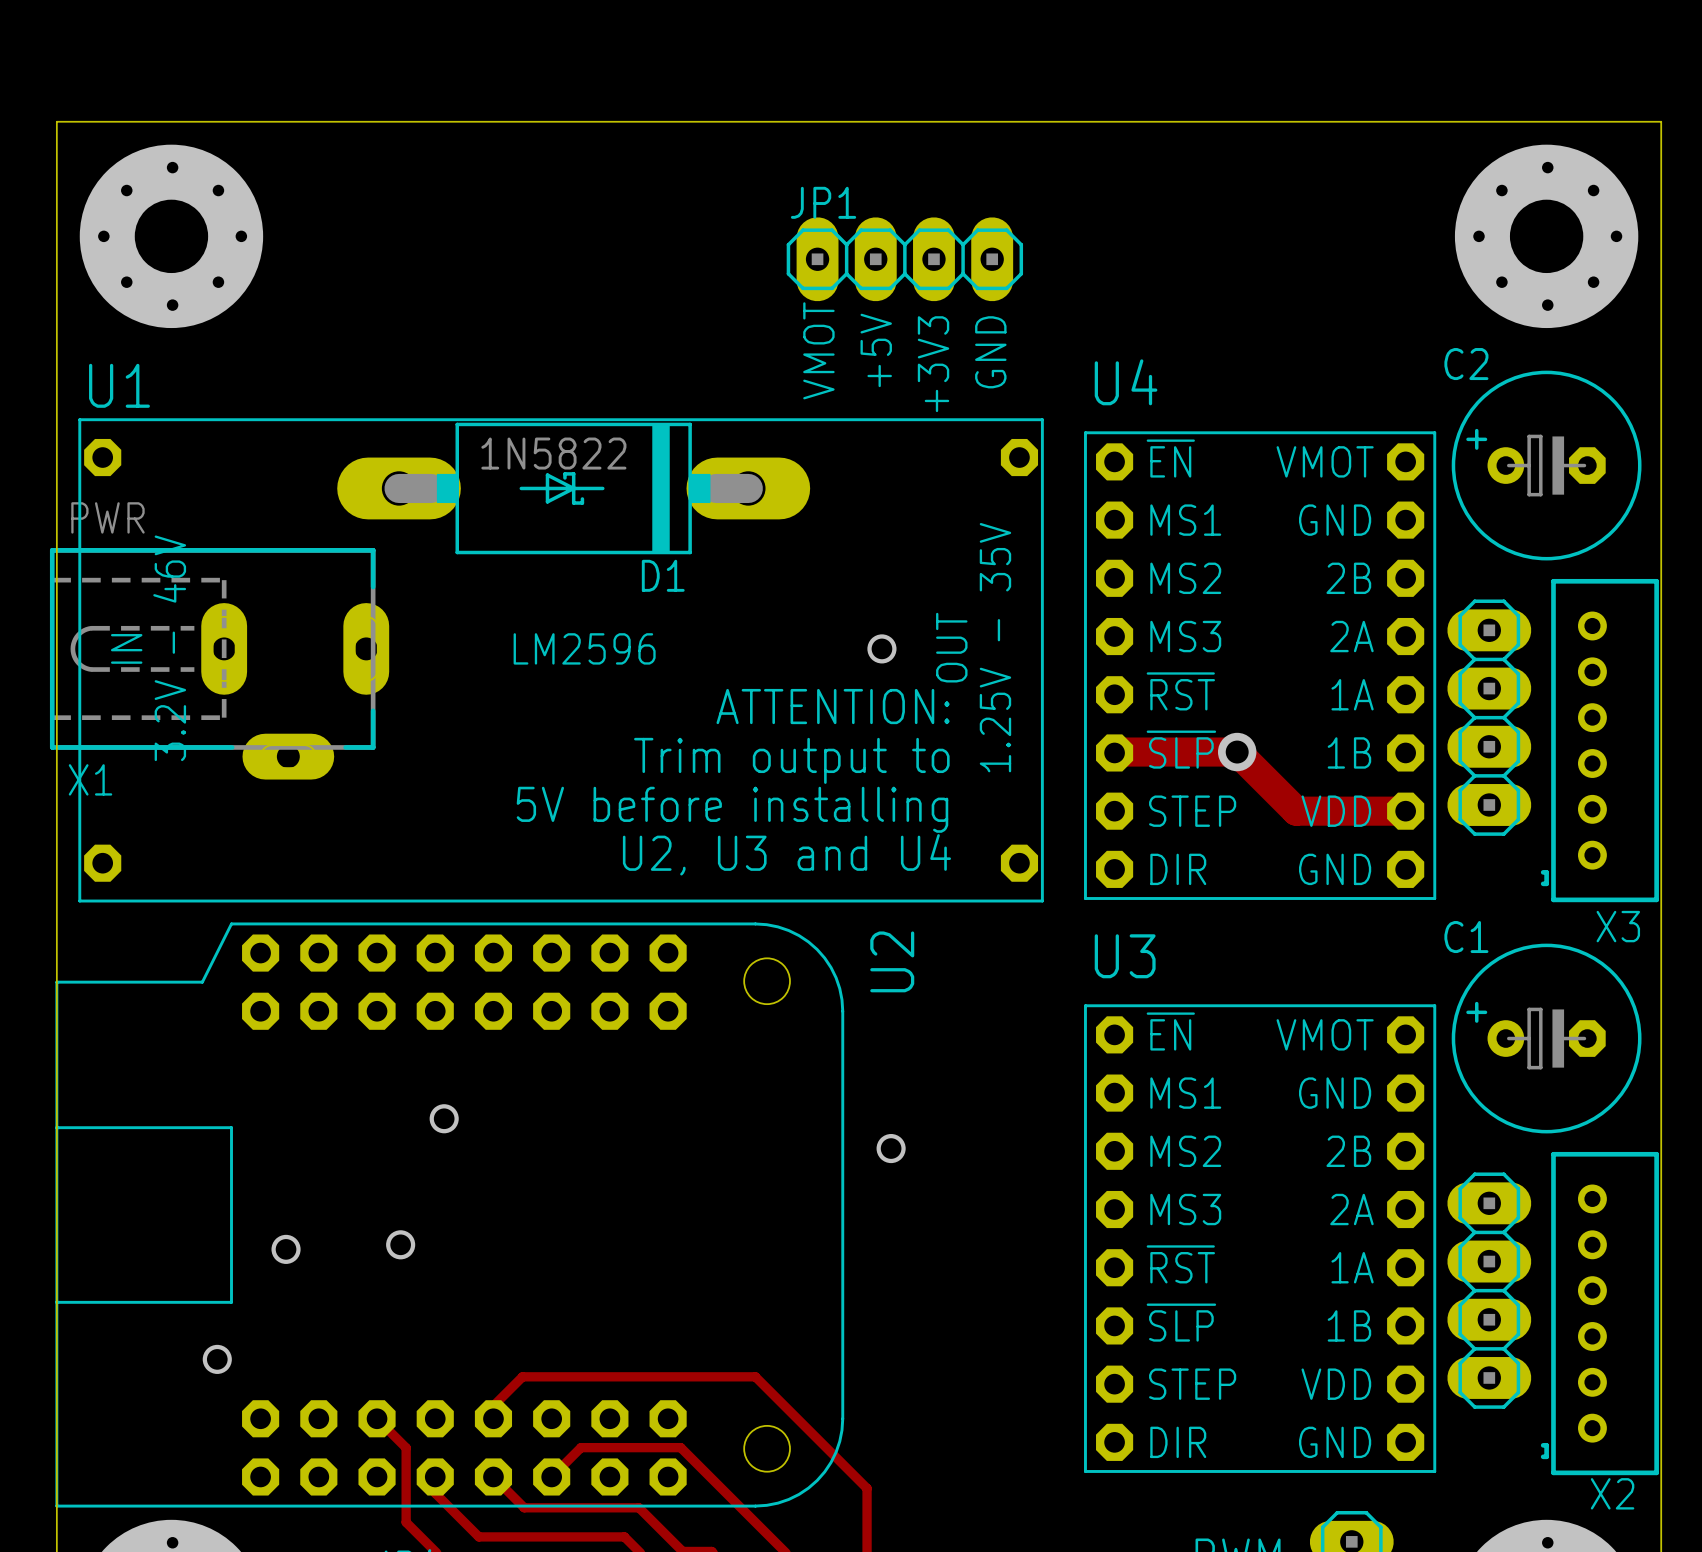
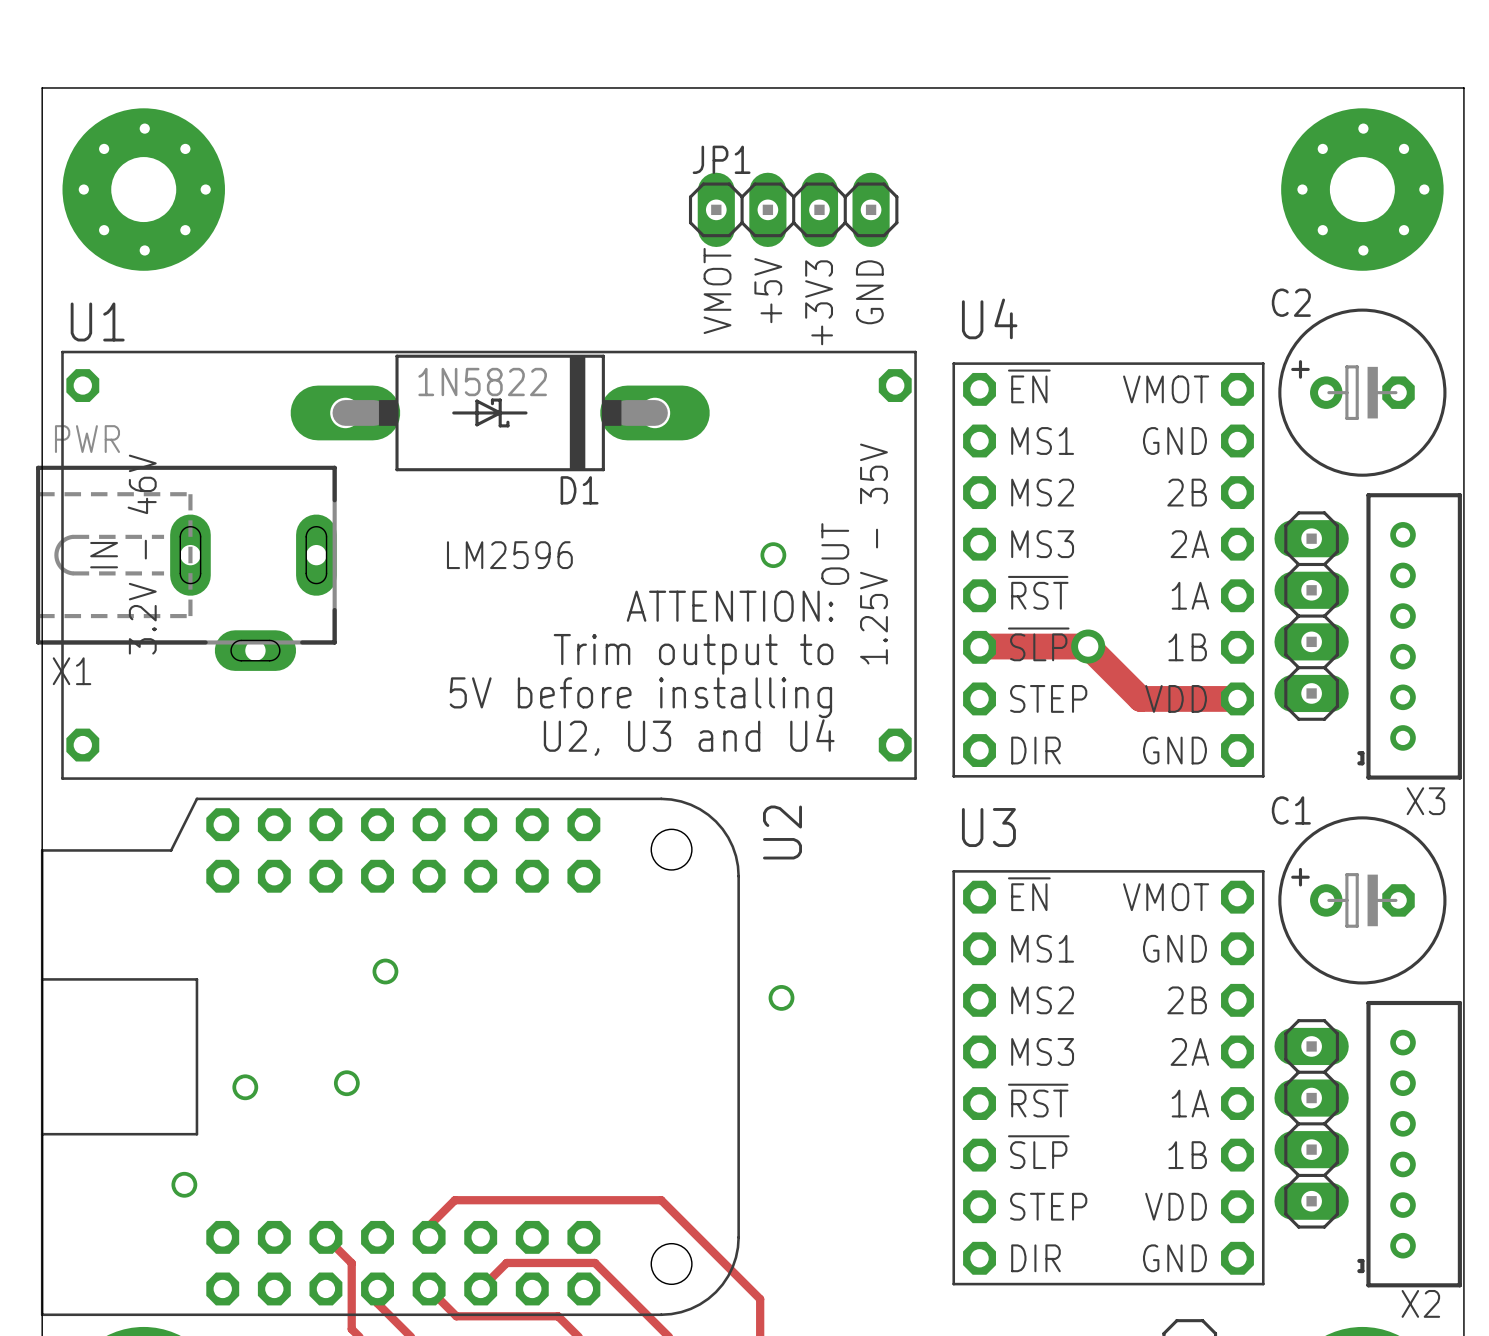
X1 footprint: [49, 548, 390, 780] -> [36, 465, 337, 671]

